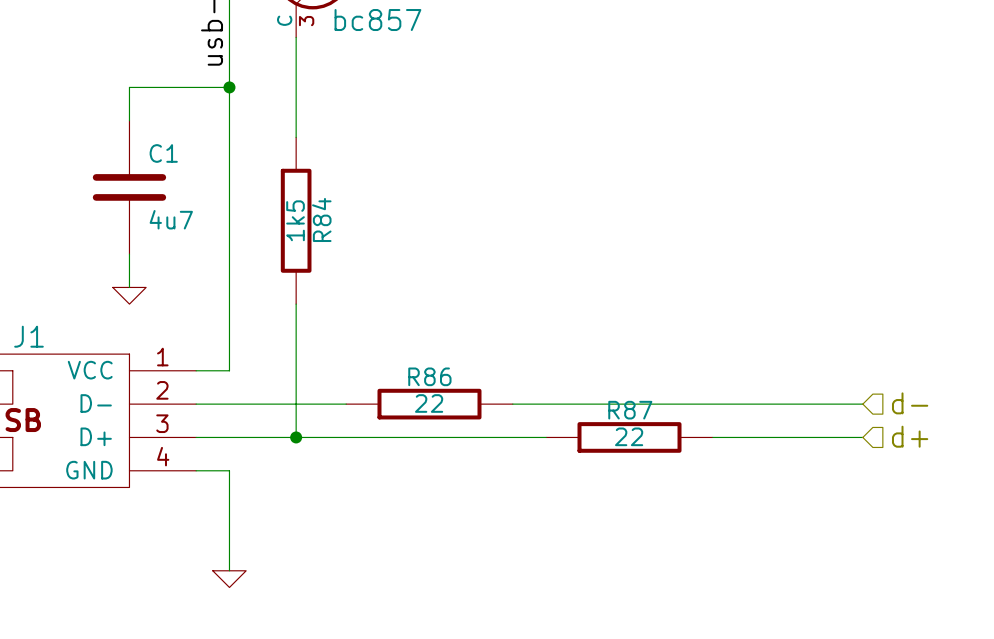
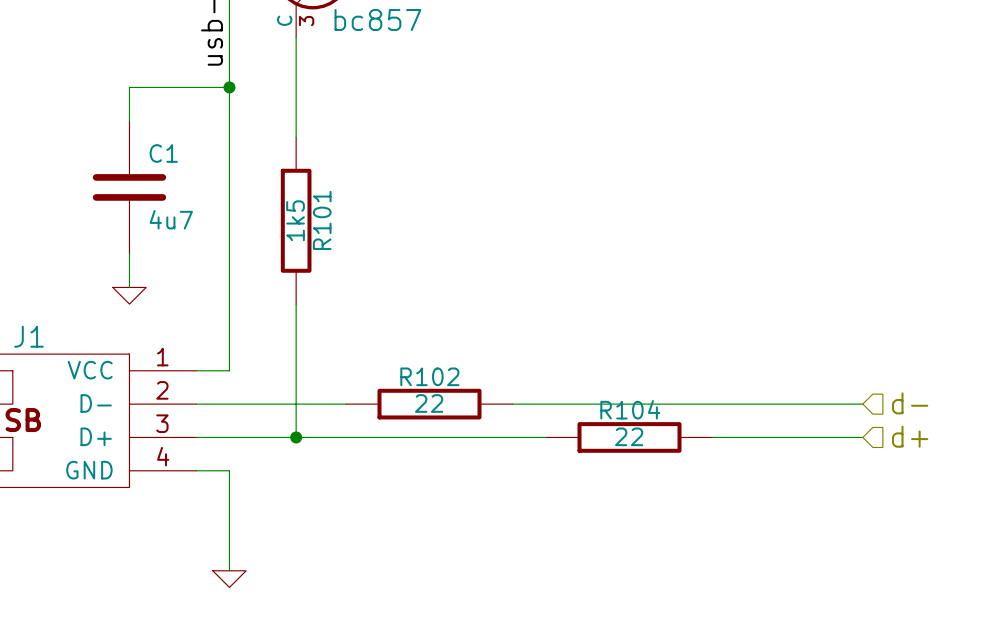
R84 name: R84 (321, 219) -> R101 (322, 220)
R86 name: R86 (429, 376) -> R102 (429, 376)
R87 name: R87 (630, 410) -> R104 (630, 409)

